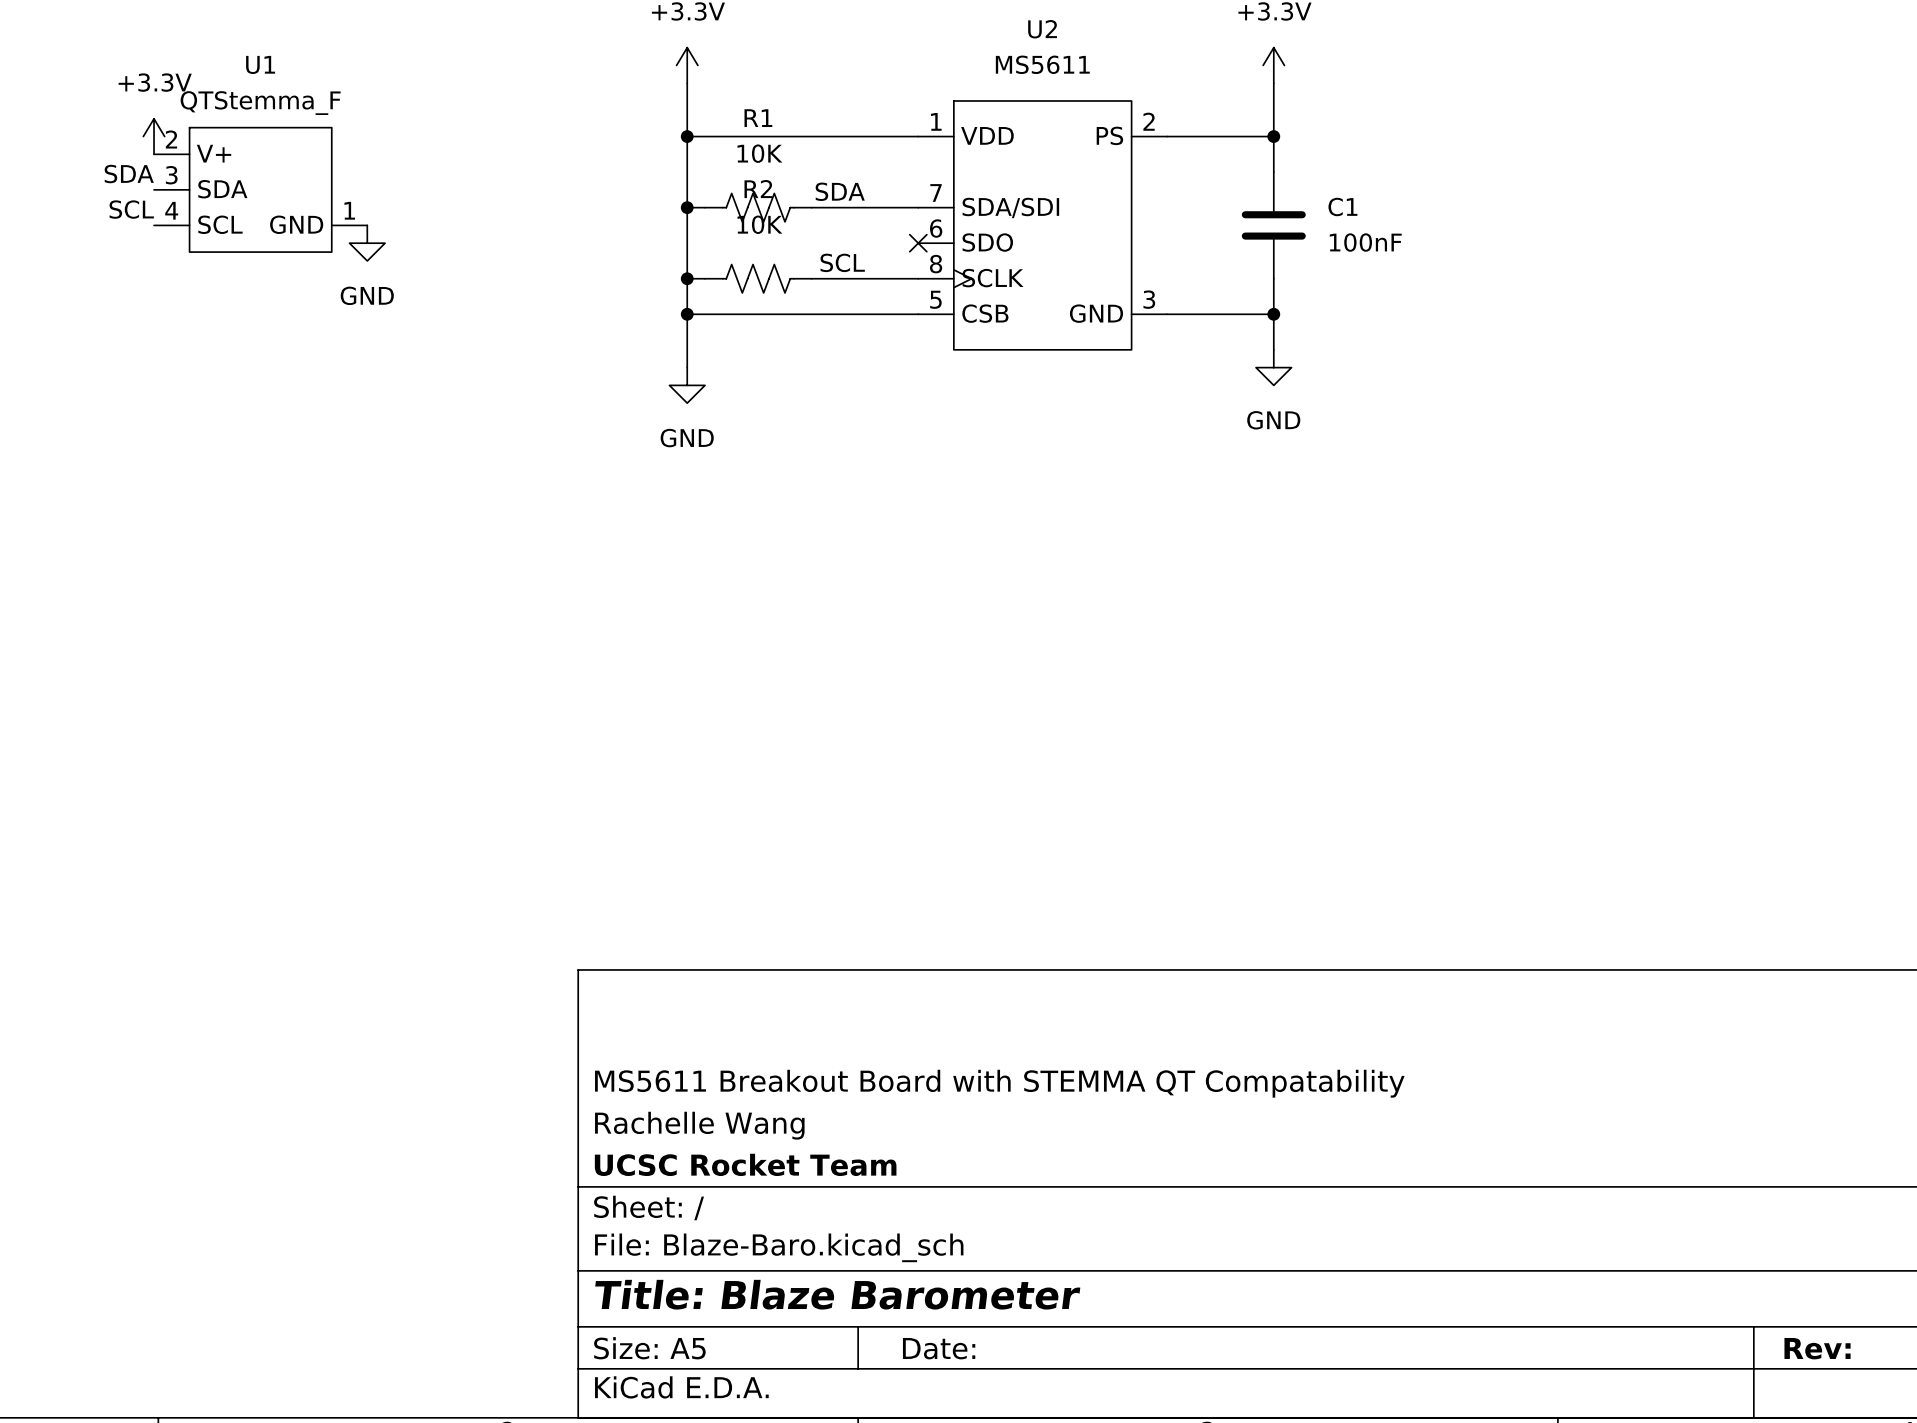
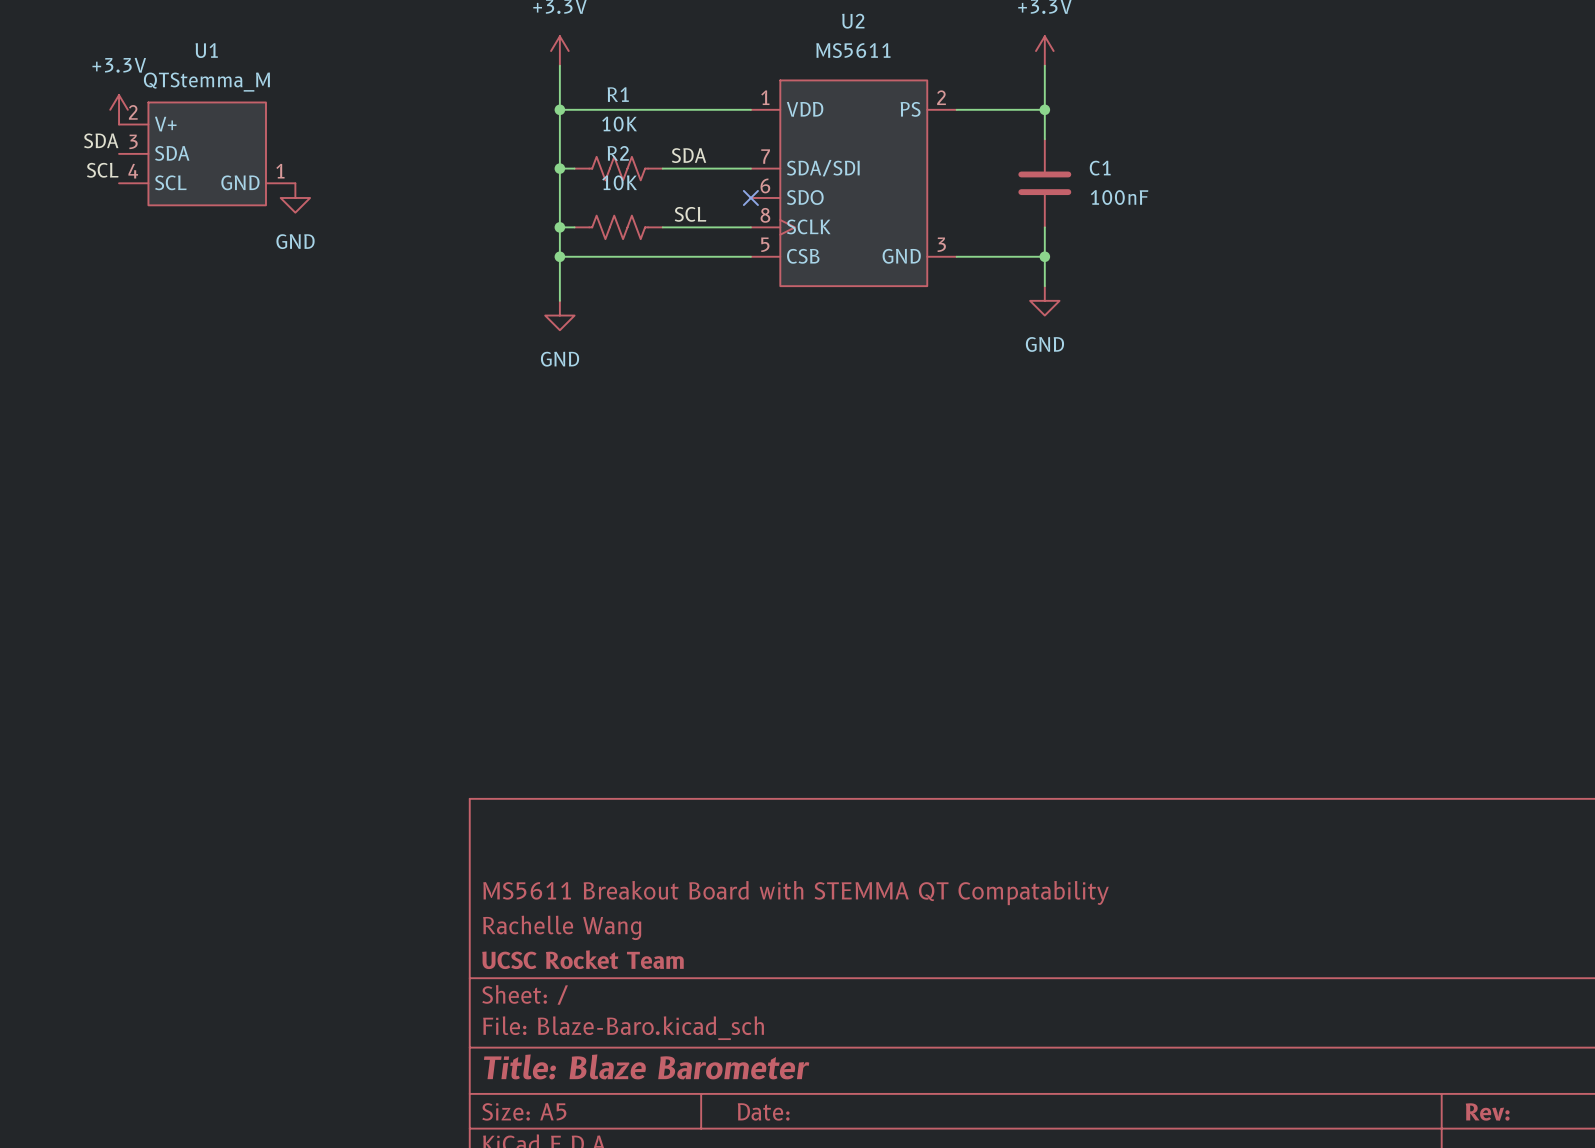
U1 value: QTStemma_F (260, 103) -> QTStemma_M (206, 82)

